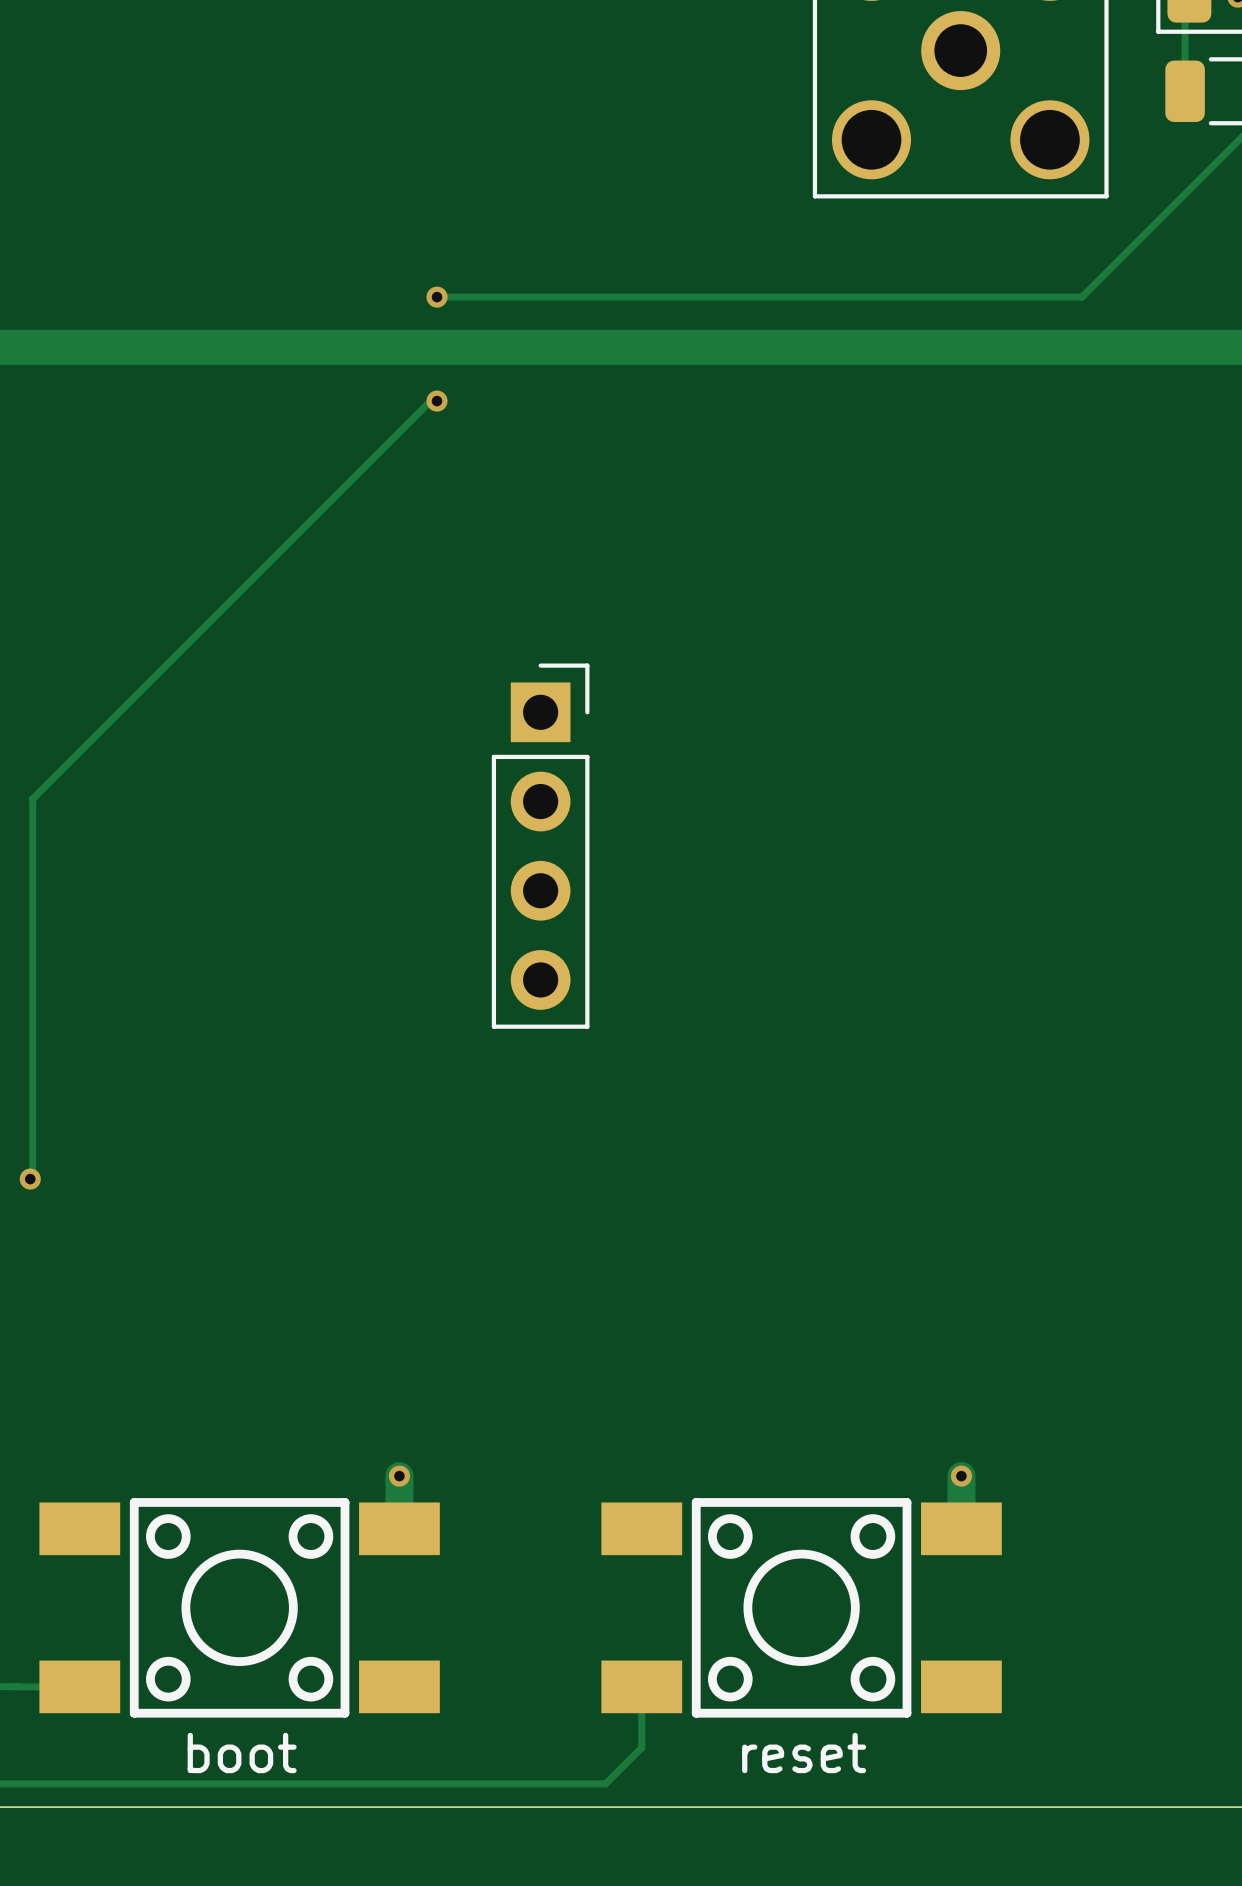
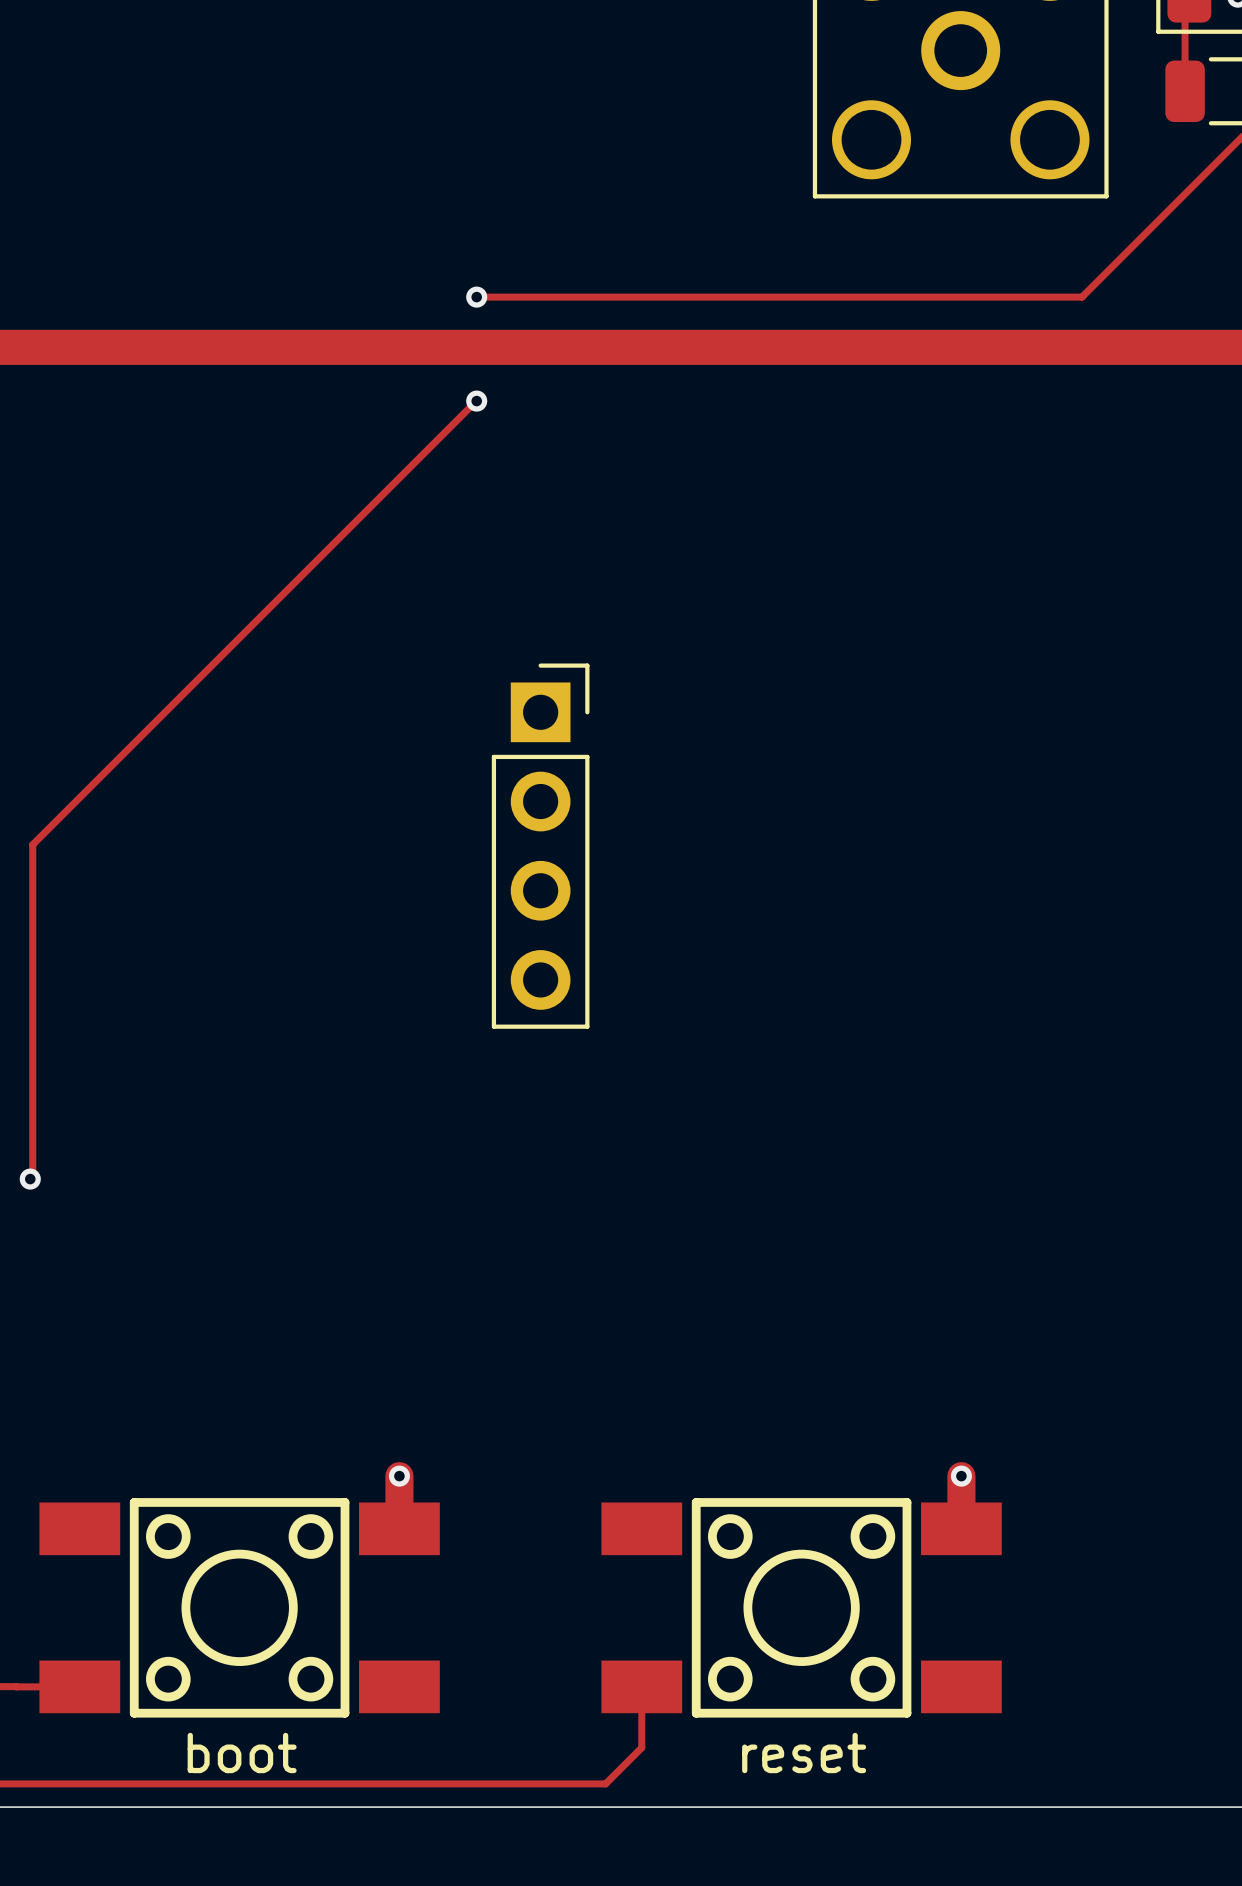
track: (437, 297) (476, 297) -> none
via position: (437, 297) -> (476, 297)
track: (431, 400) (32, 799) (32, 844) -> (476, 400) (32, 844)
via position: (437, 401) -> (476, 401)

